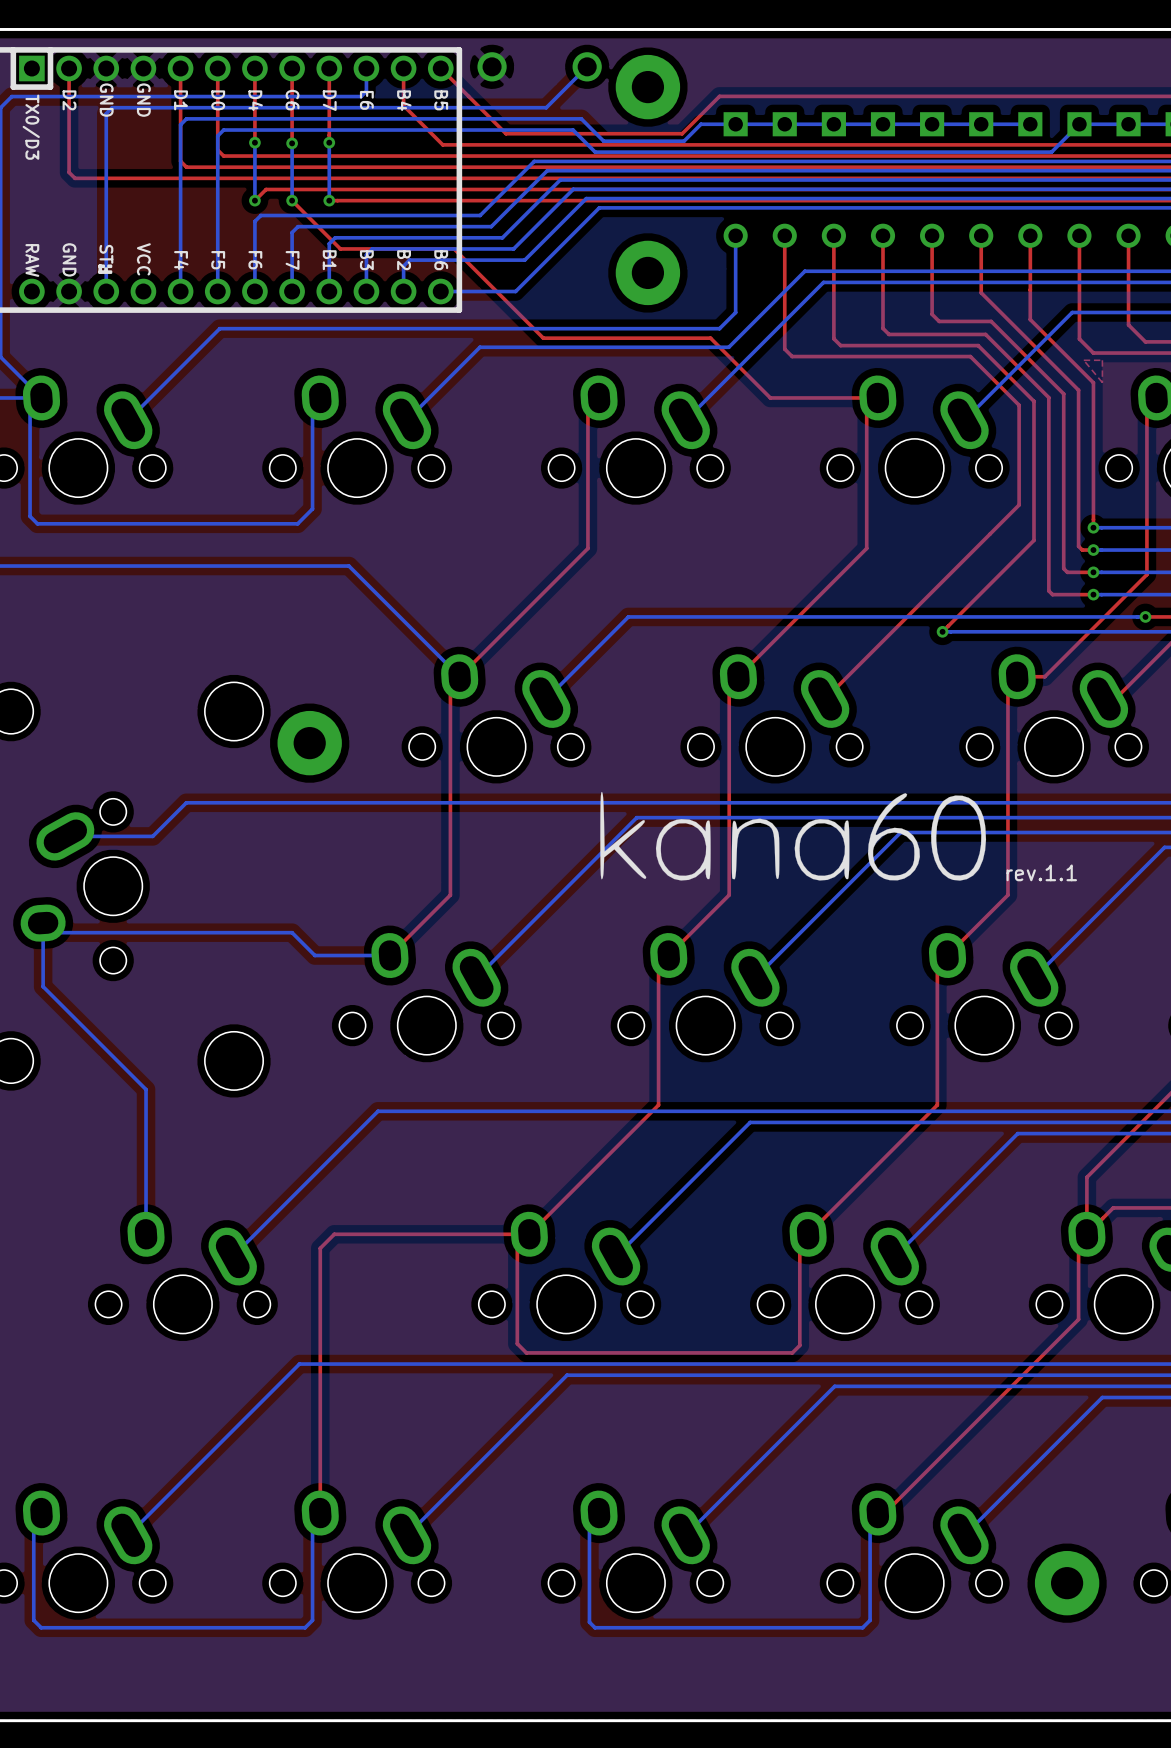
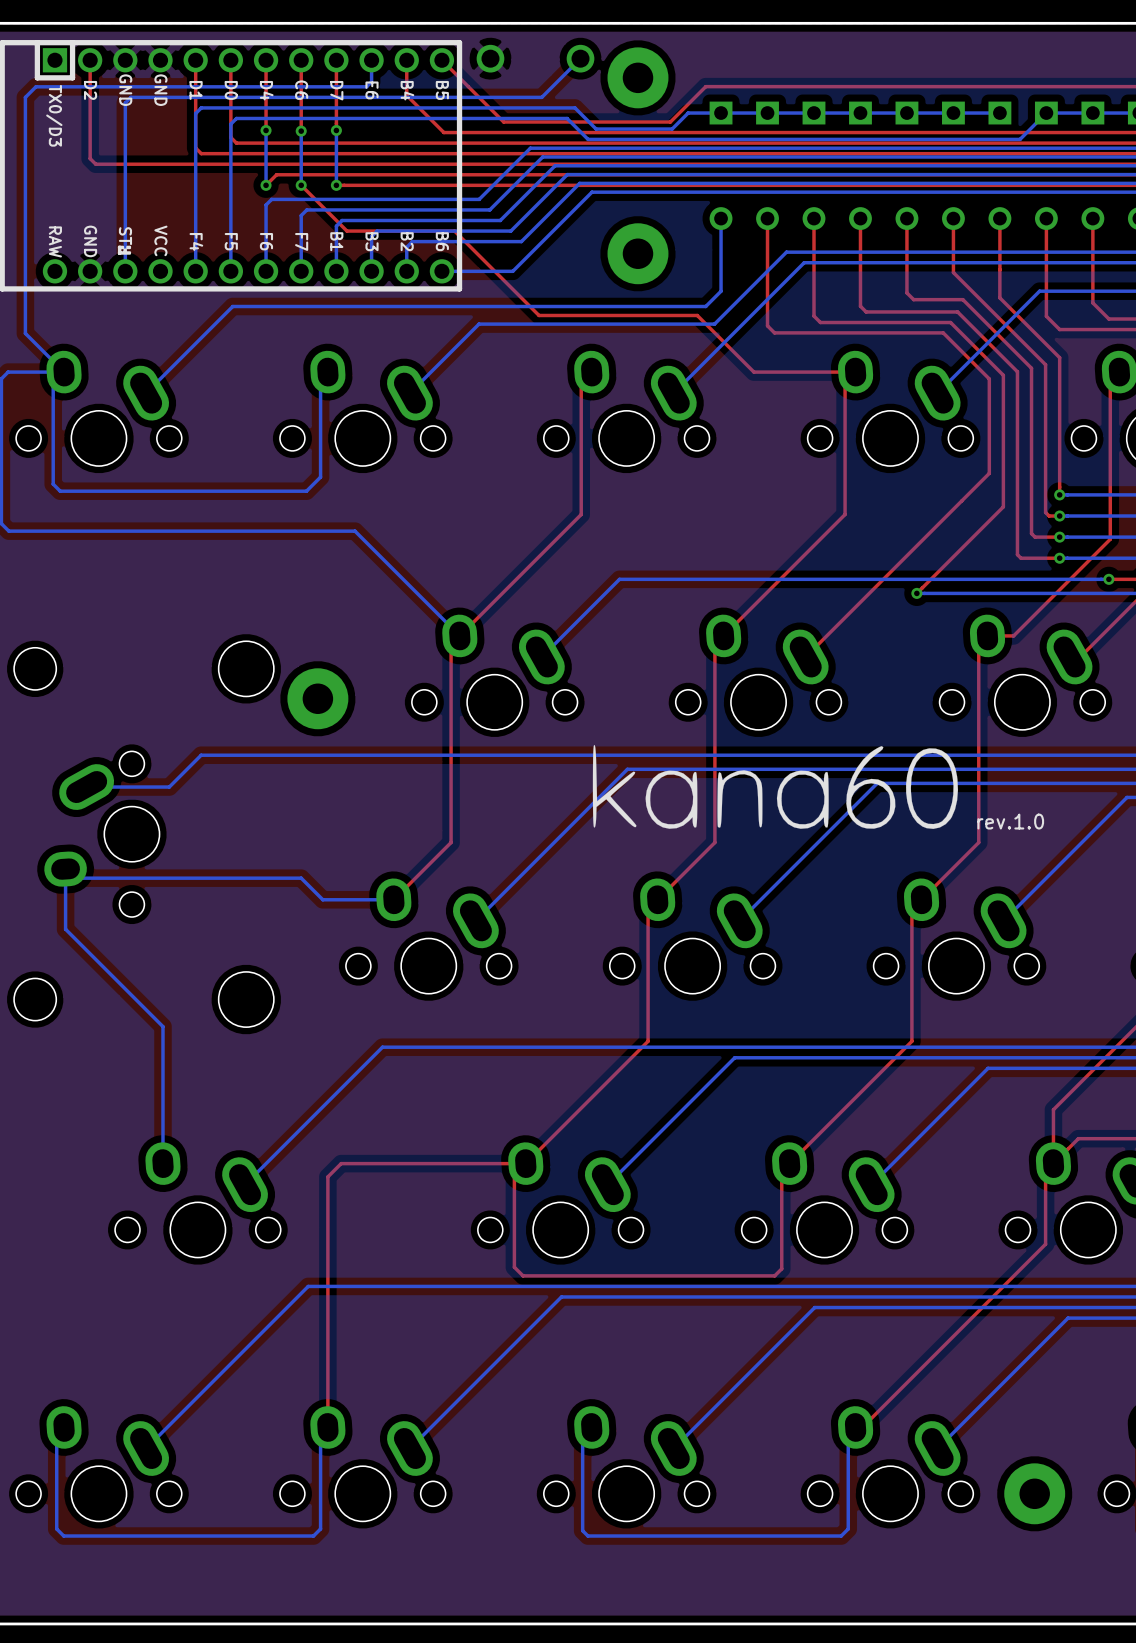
top zone outline: (1102, 360) (1102, 382) (1083, 360) (1102, 360) -> none
text: rev.1.1 (1041, 872) -> rev.1.0 (1010, 821)

